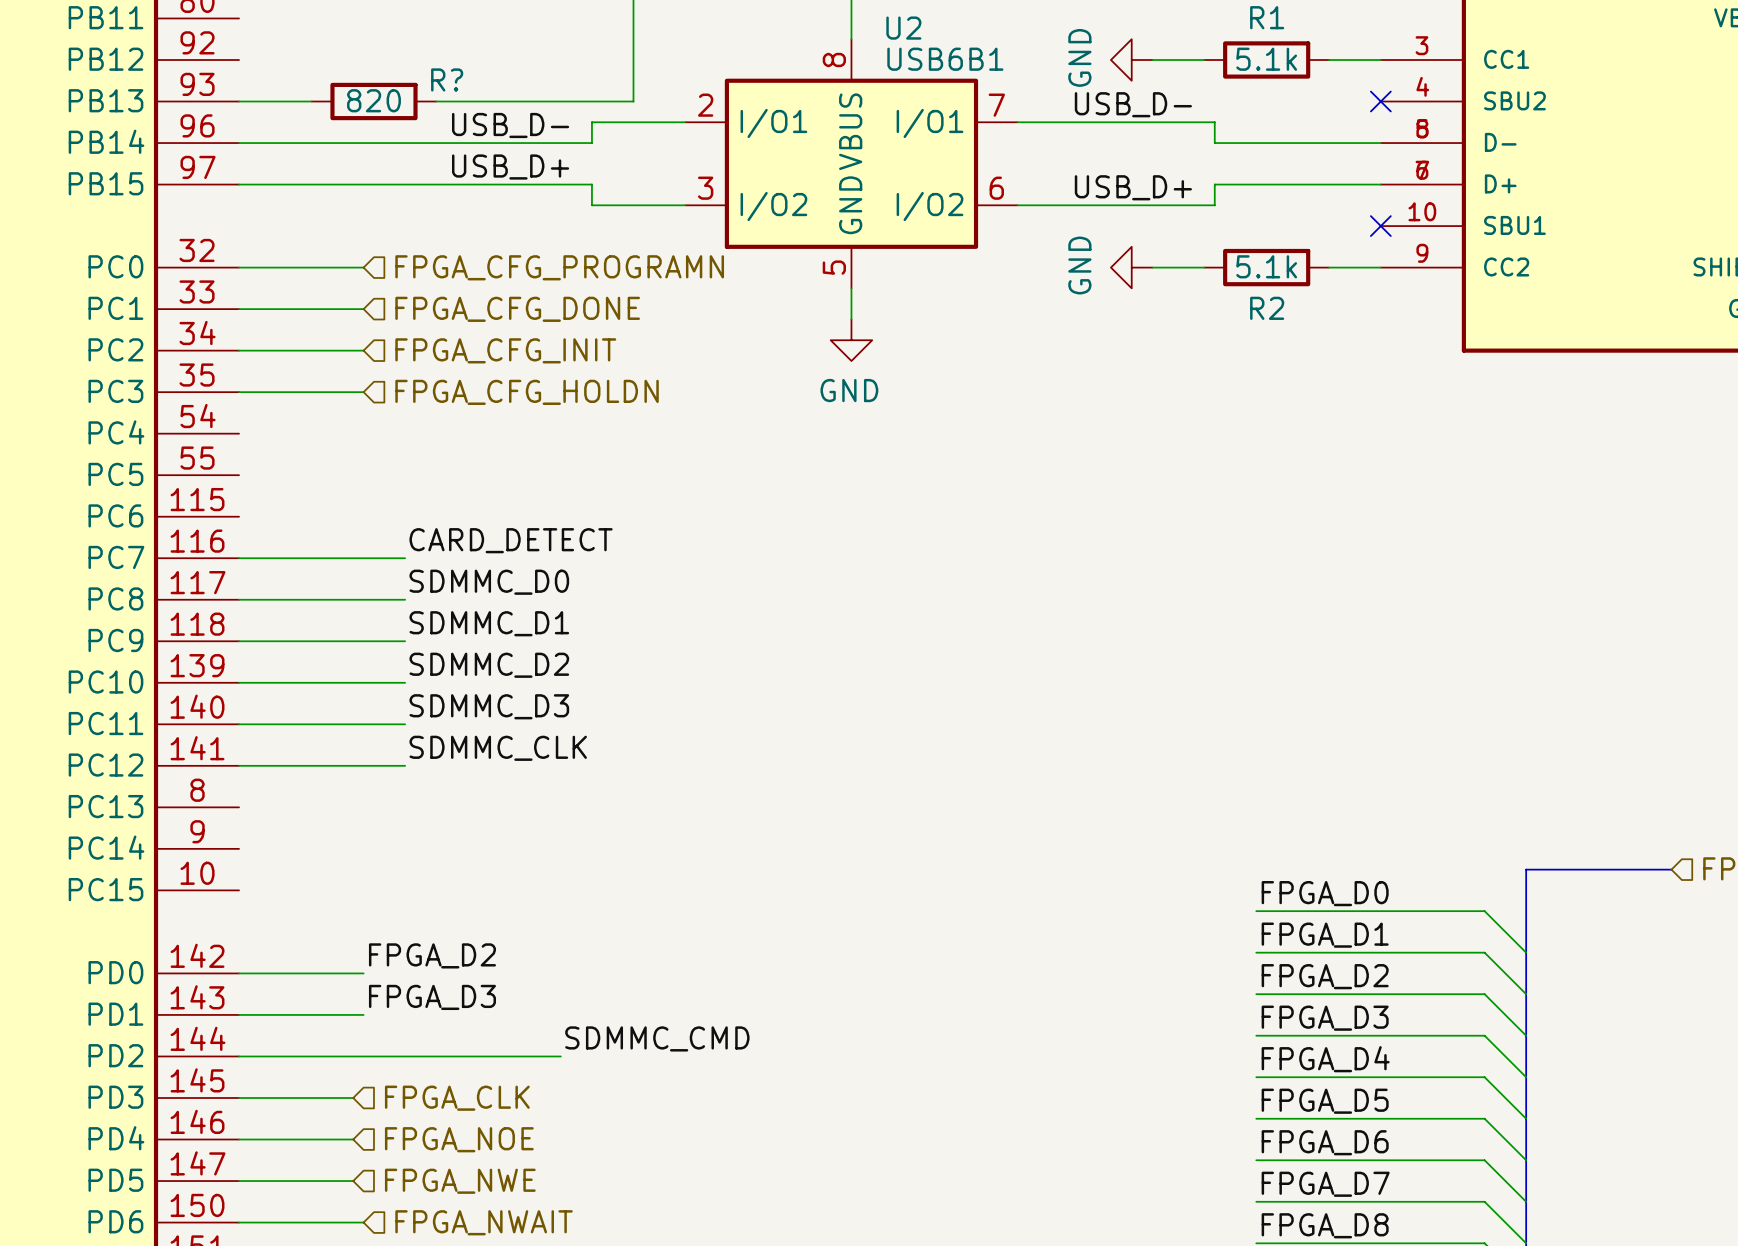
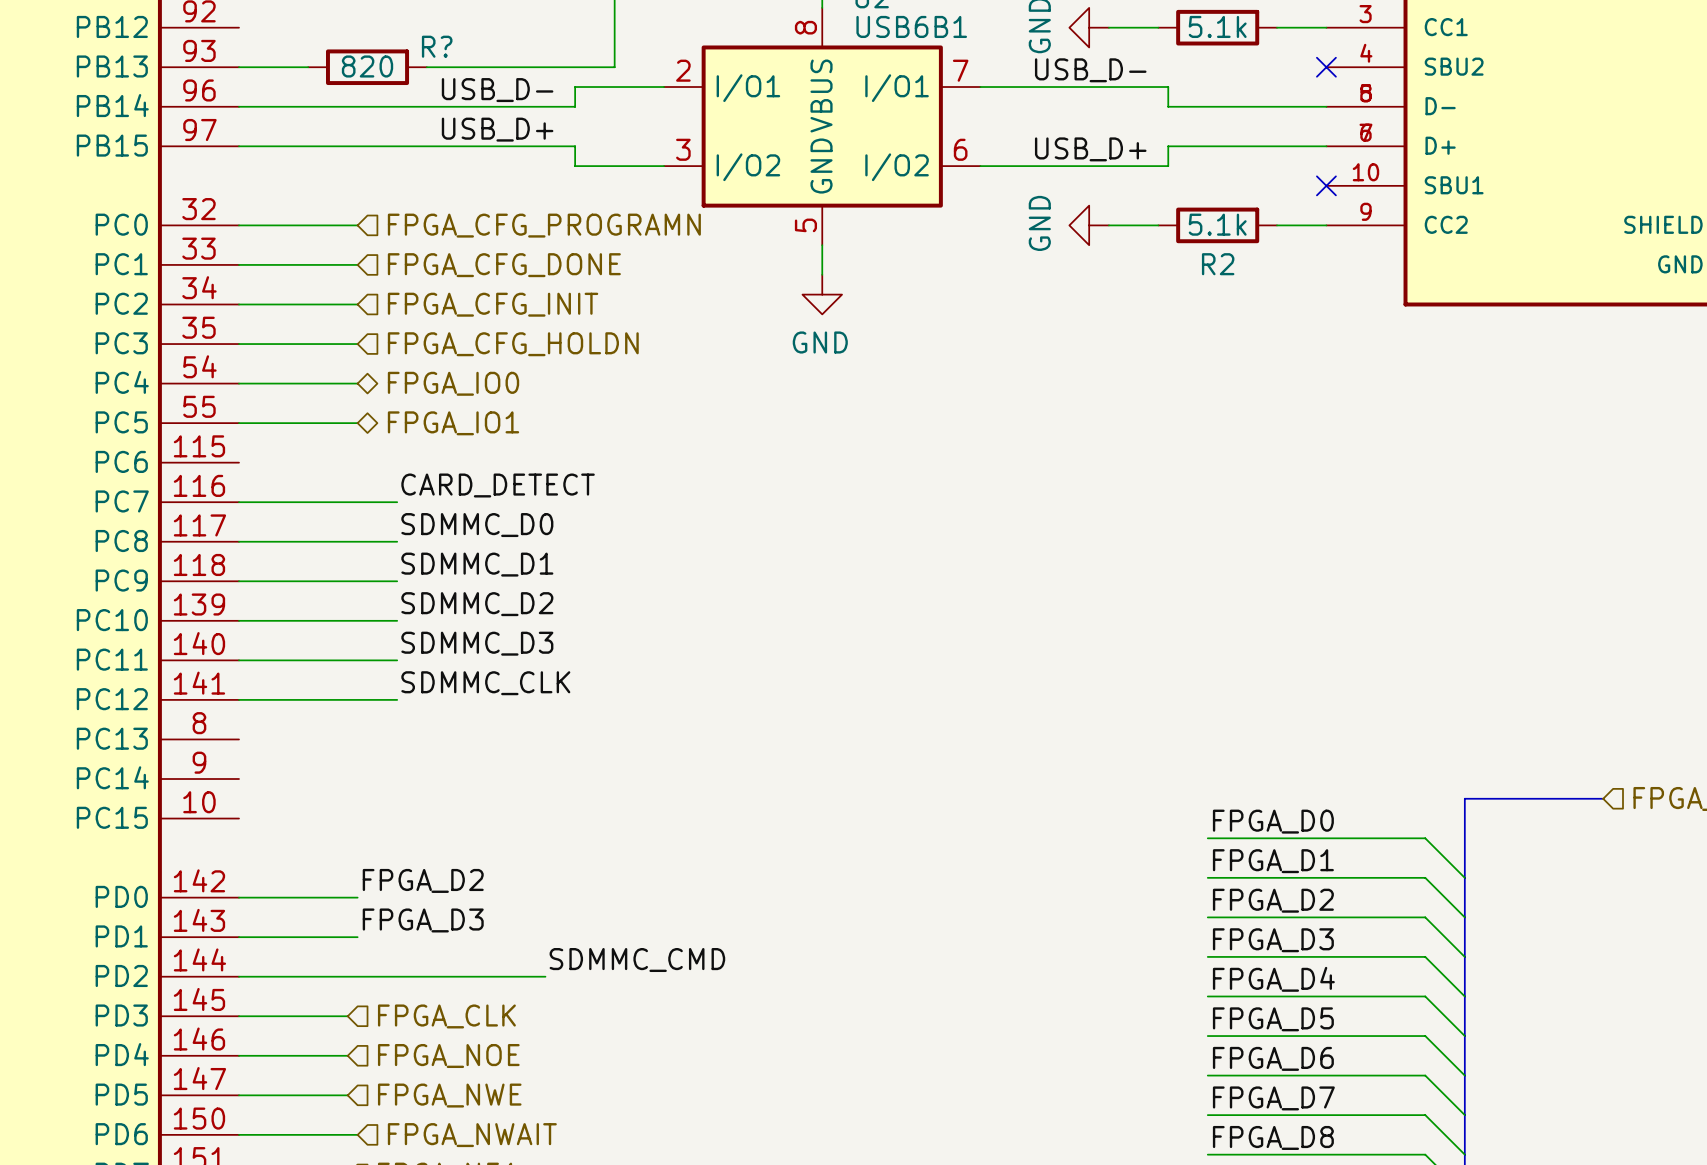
wire: none -> (239, 383) (357, 383)
hierarchical label: none -> FPGA_IO0 (453, 383)
wire: none -> (239, 423) (357, 423)
hierarchical label: none -> FPGA_IO1 (453, 423)

